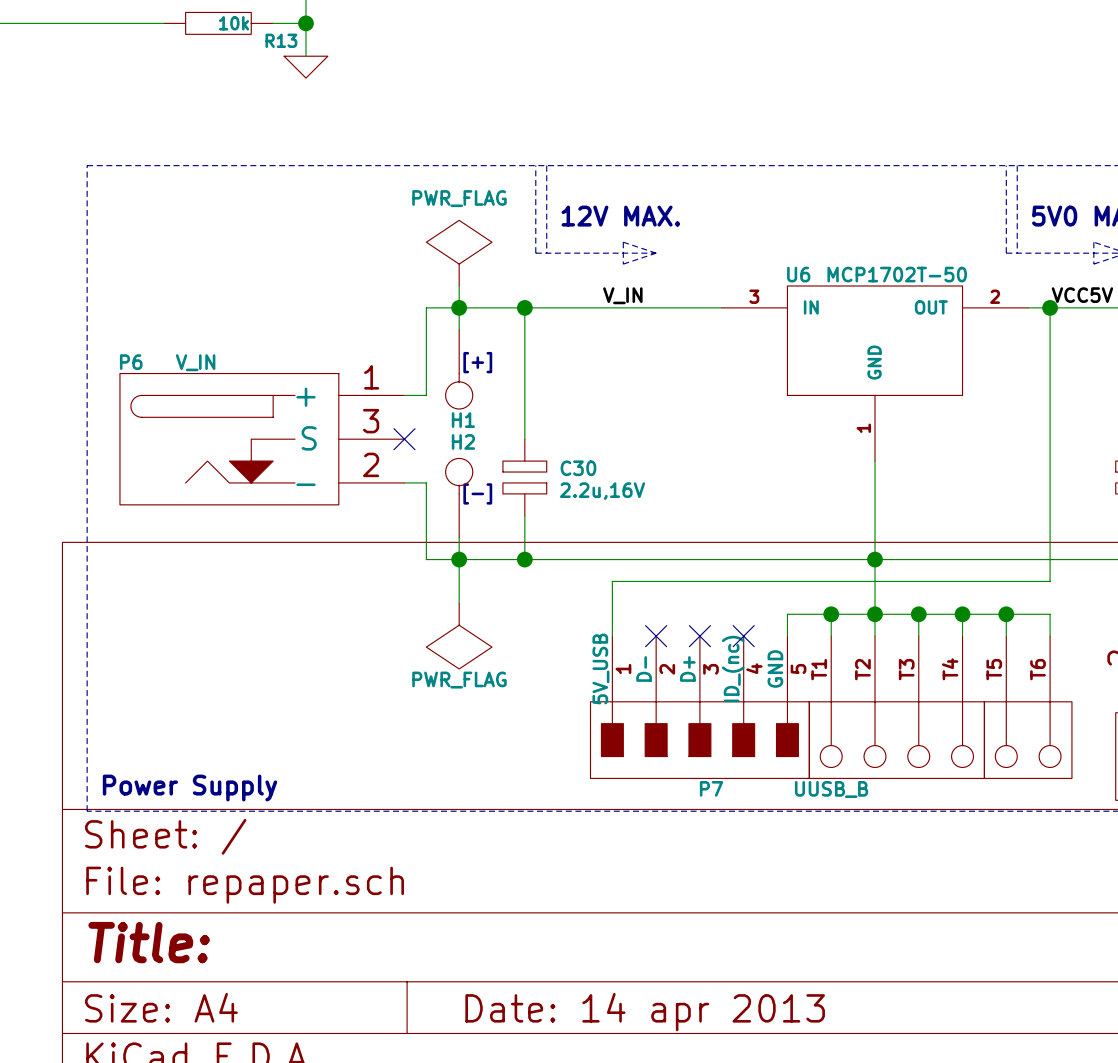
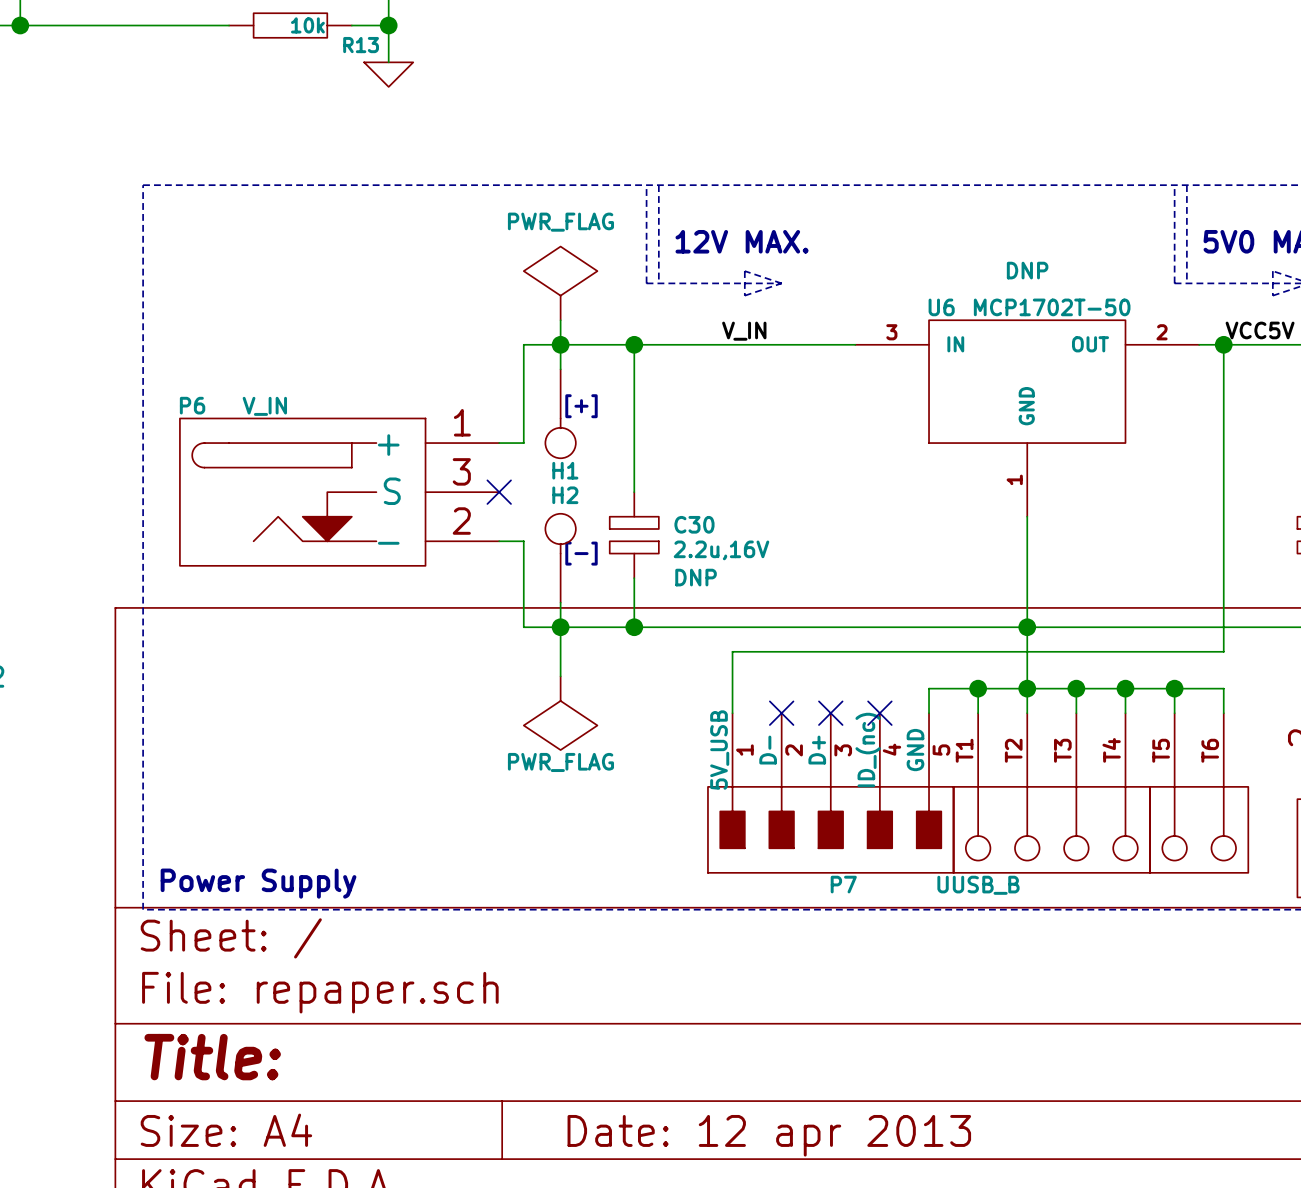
U6 text: none -> DNP (1027, 270)
C30 text: none -> DNP (696, 577)
title block: Date: 14 apr 2013 (645, 1012) -> Date: 12 apr 2013 (769, 1135)

